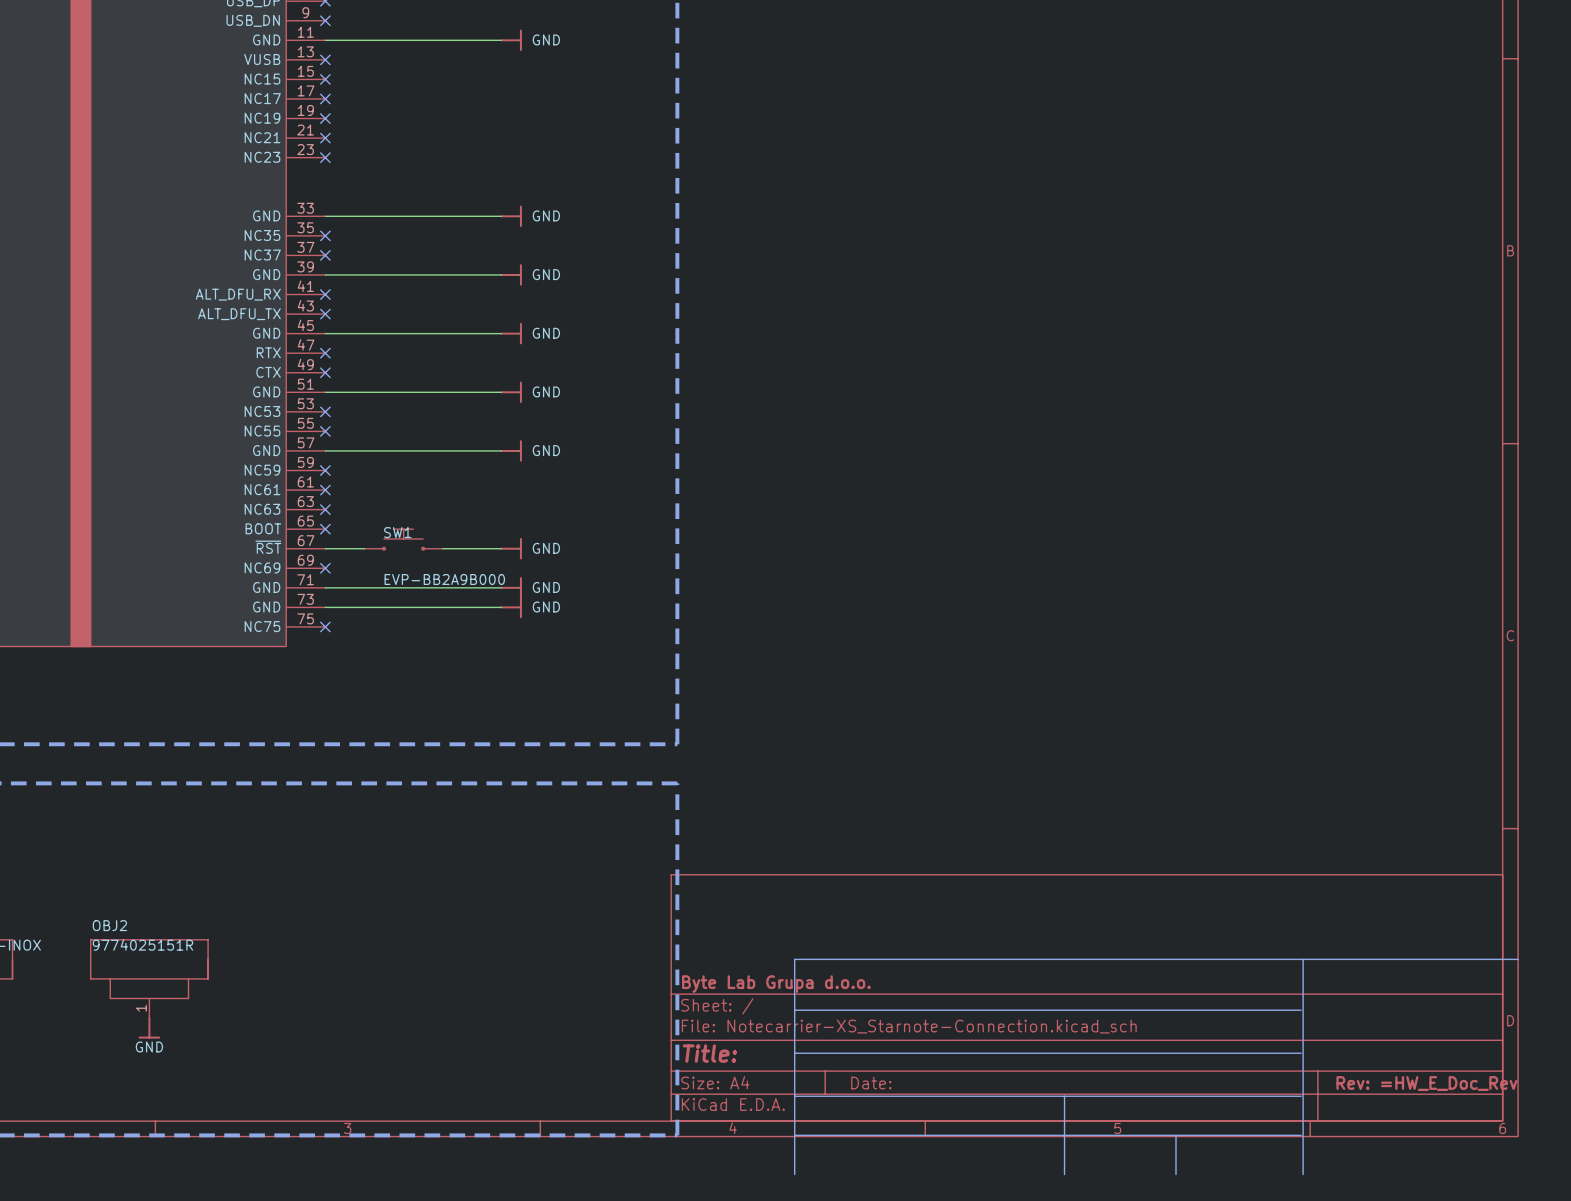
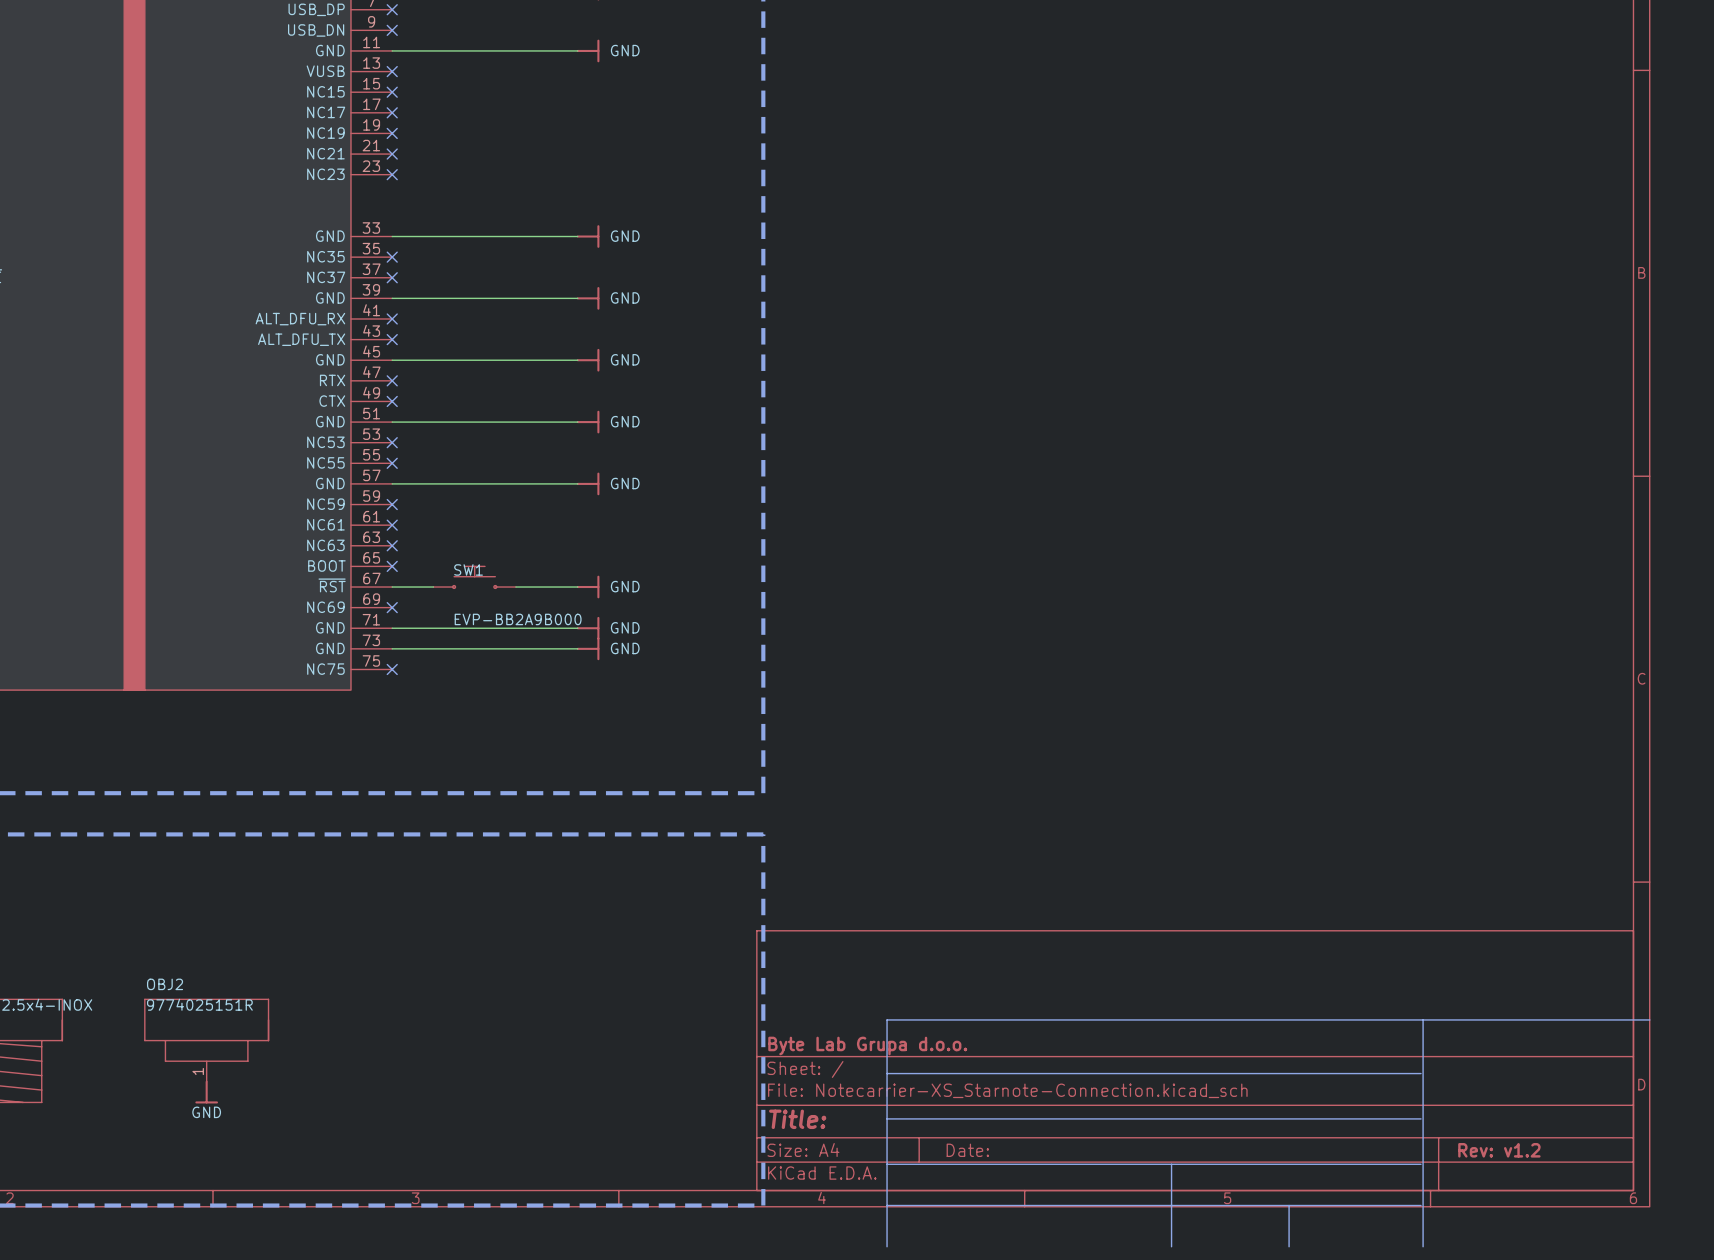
title block: Rev: =HW_E_Doc_Rev (1426, 1083) -> Rev: v1.2 (1499, 1150)

